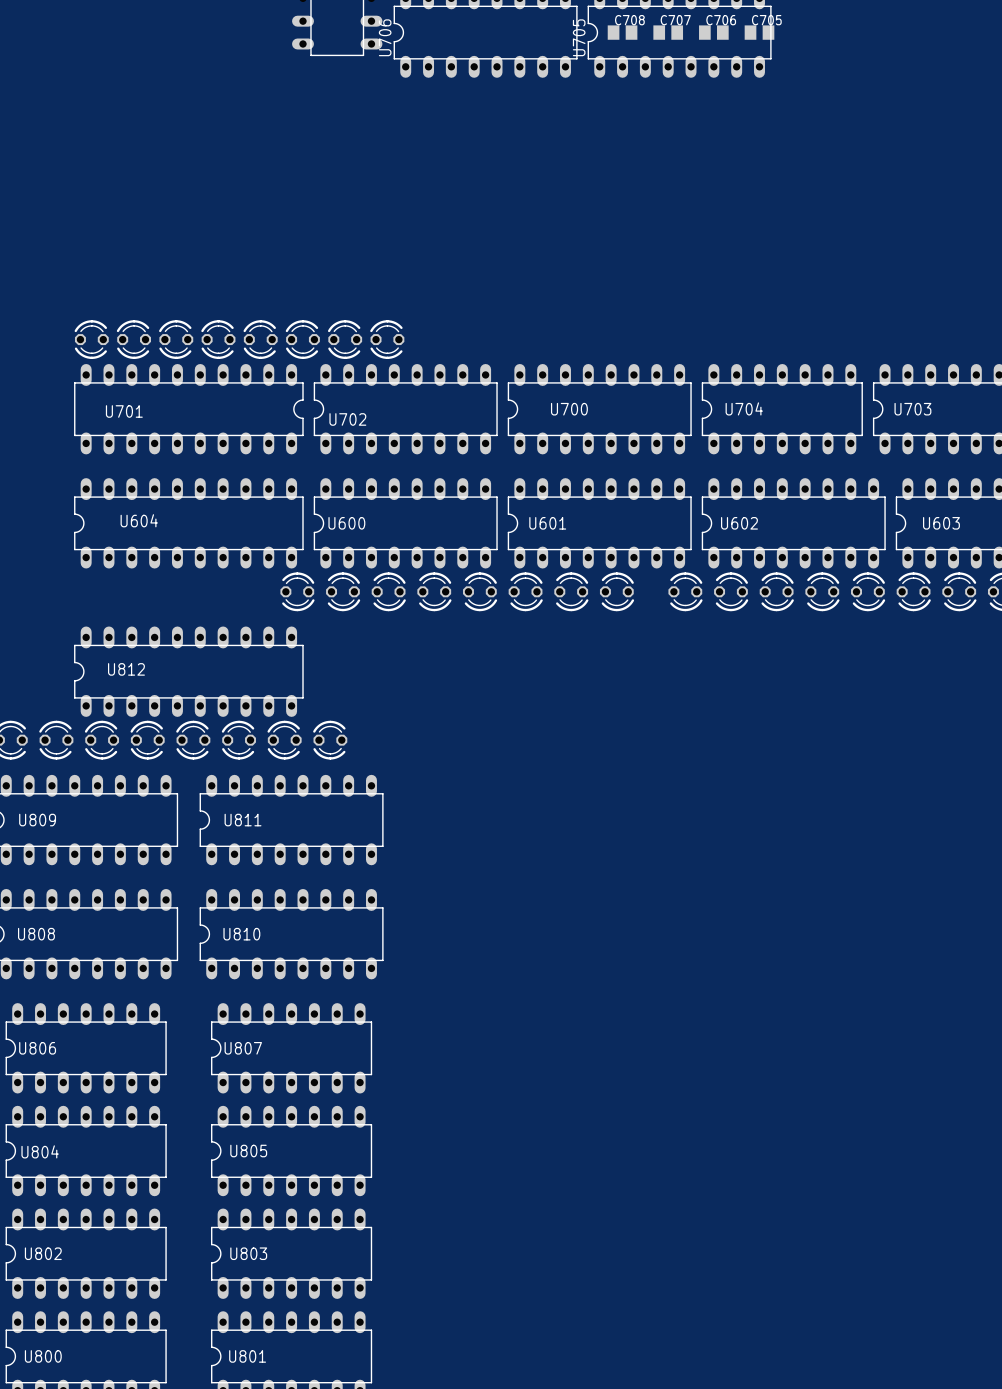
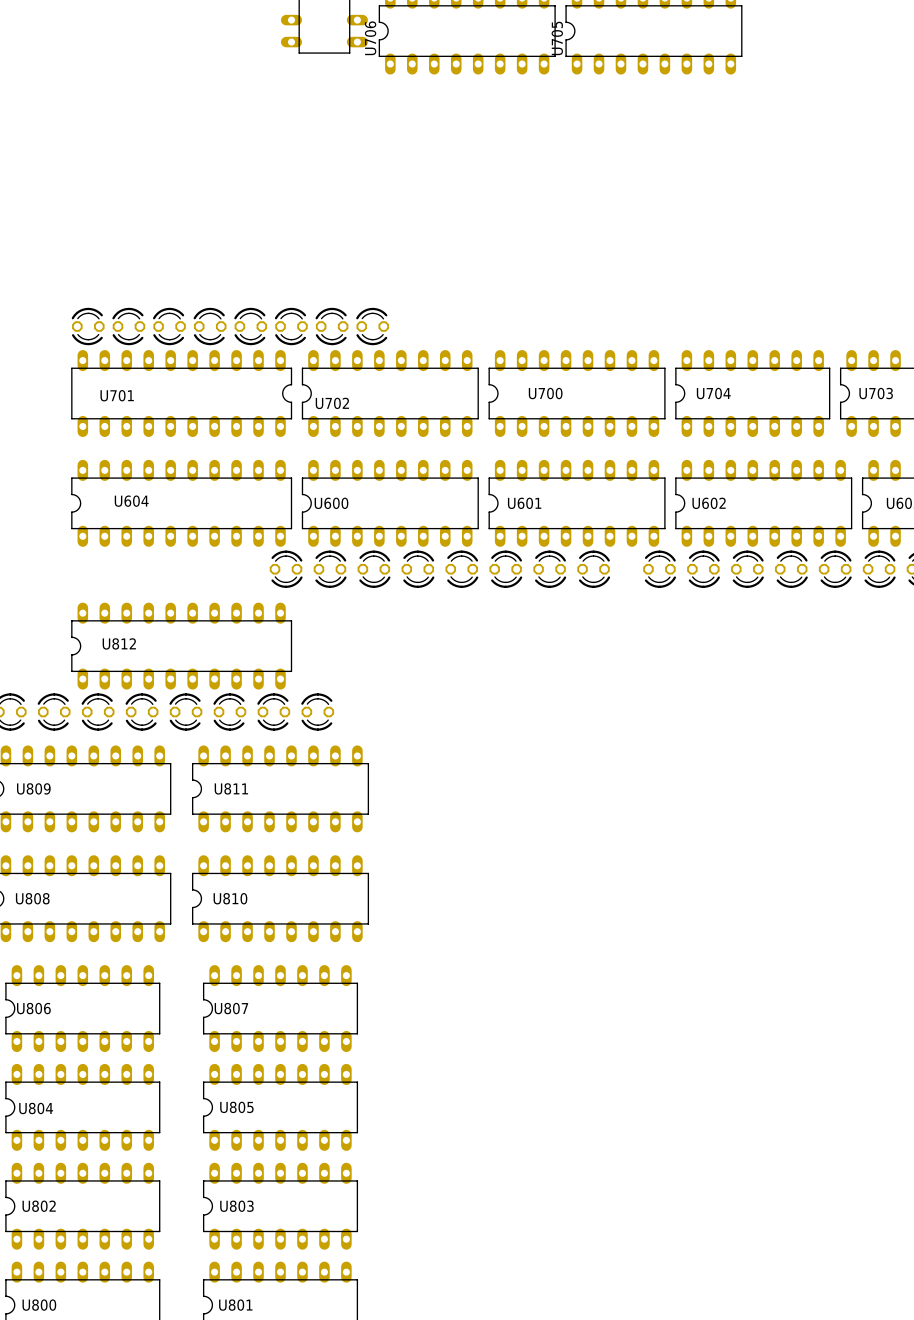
C708: (622, 32) -> none
C707: (668, 32) -> none
C706: (713, 32) -> none
C705: (759, 32) -> none

